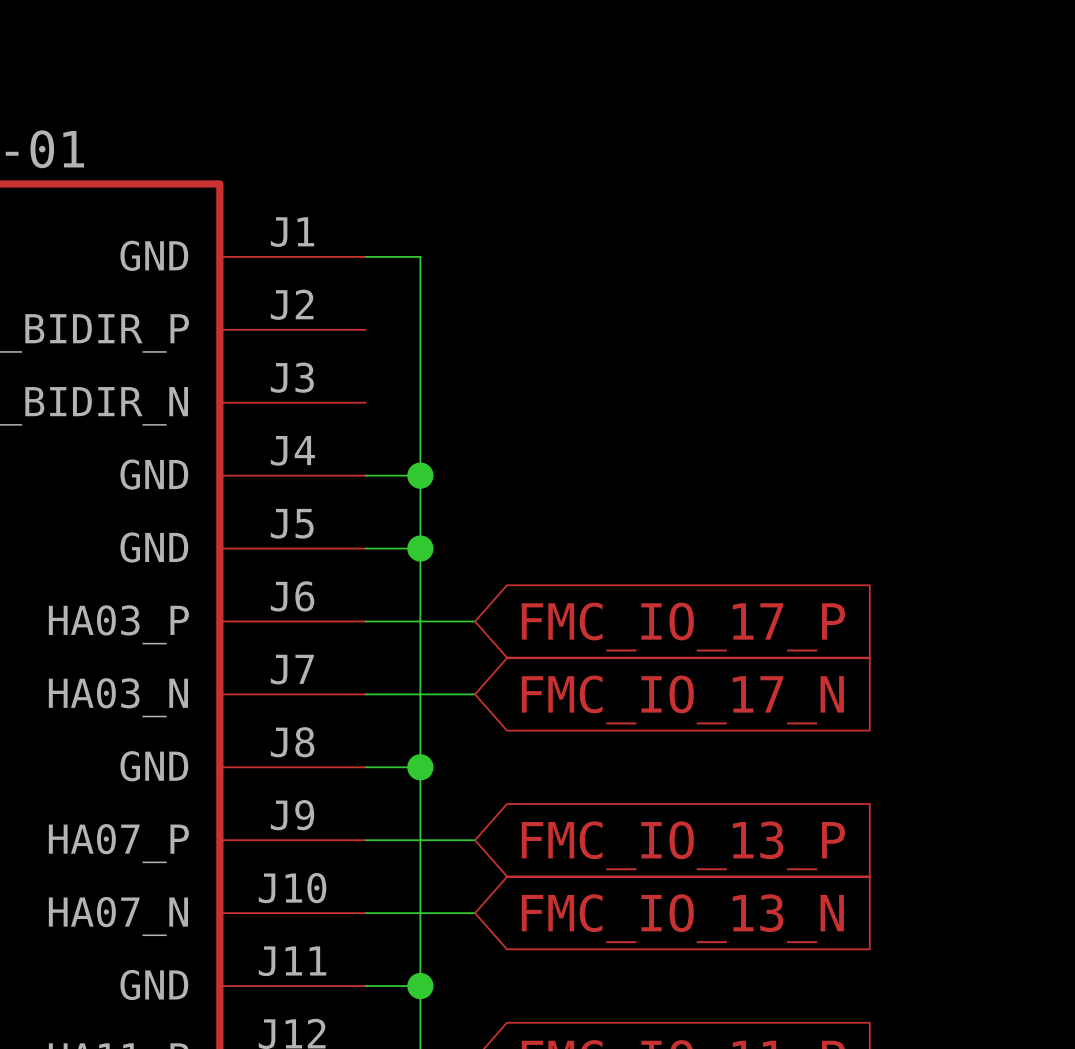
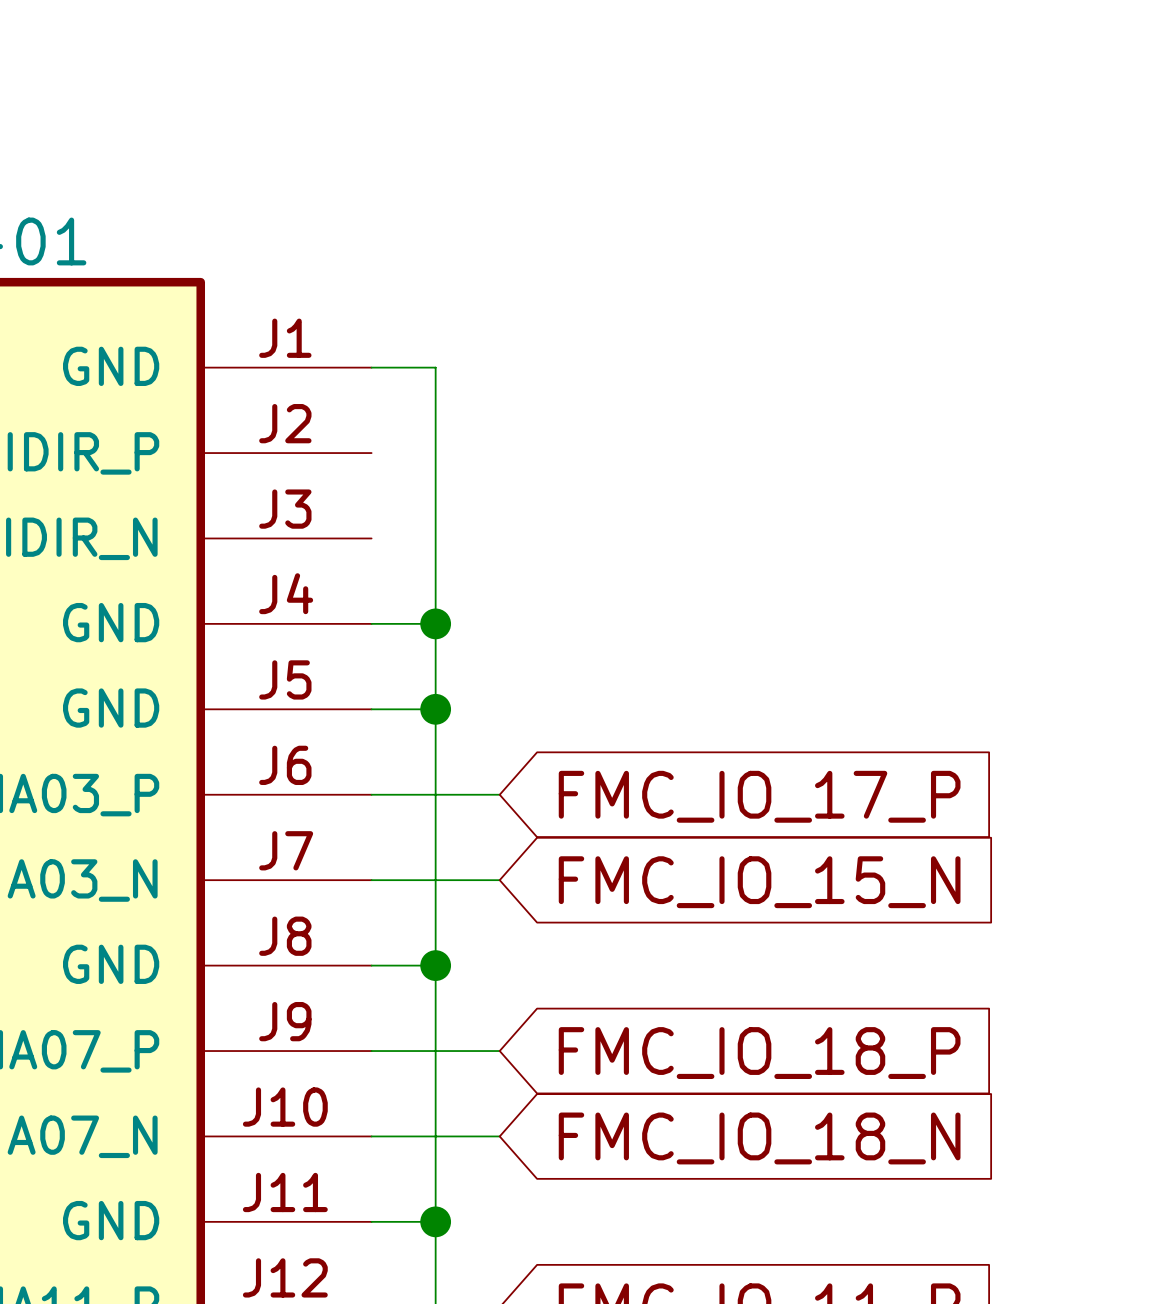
global label: FMC_IO_17_N (682, 699) -> FMC_IO_15_N (759, 882)
global label: FMC_IO_13_P (683, 845) -> FMC_IO_18_P (759, 1053)
global label: FMC_IO_13_N (682, 918) -> FMC_IO_18_N (759, 1138)

